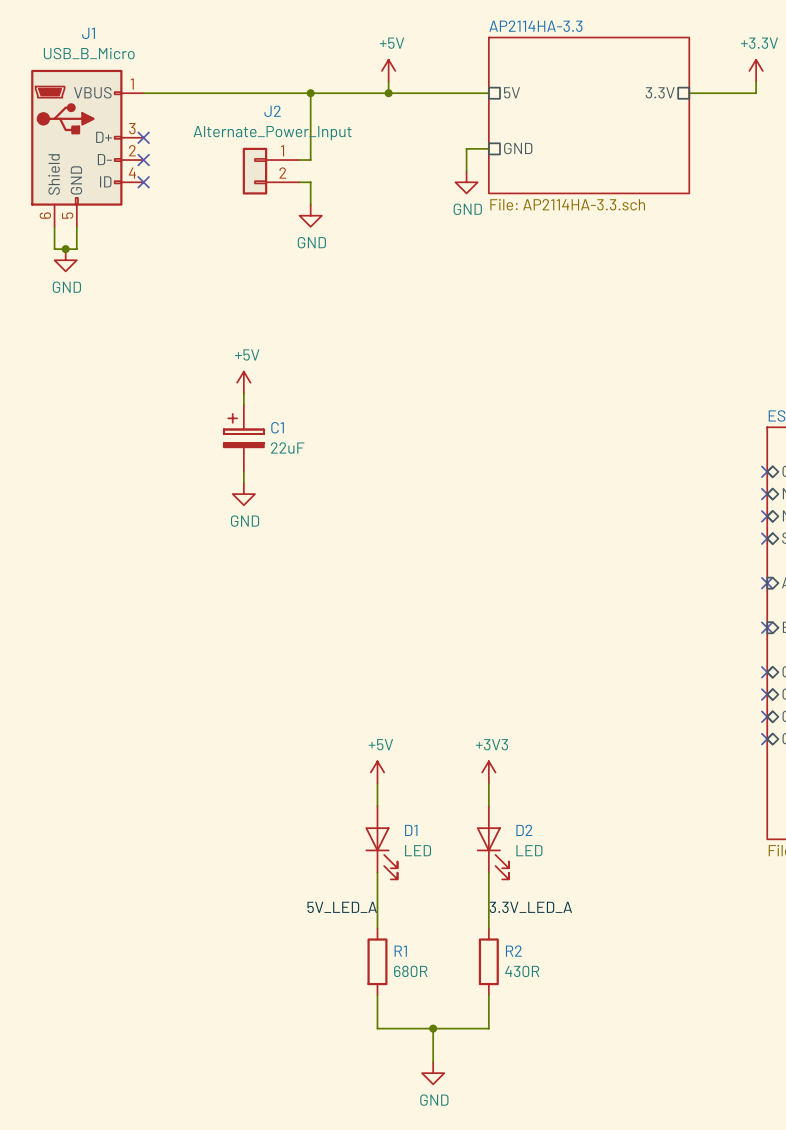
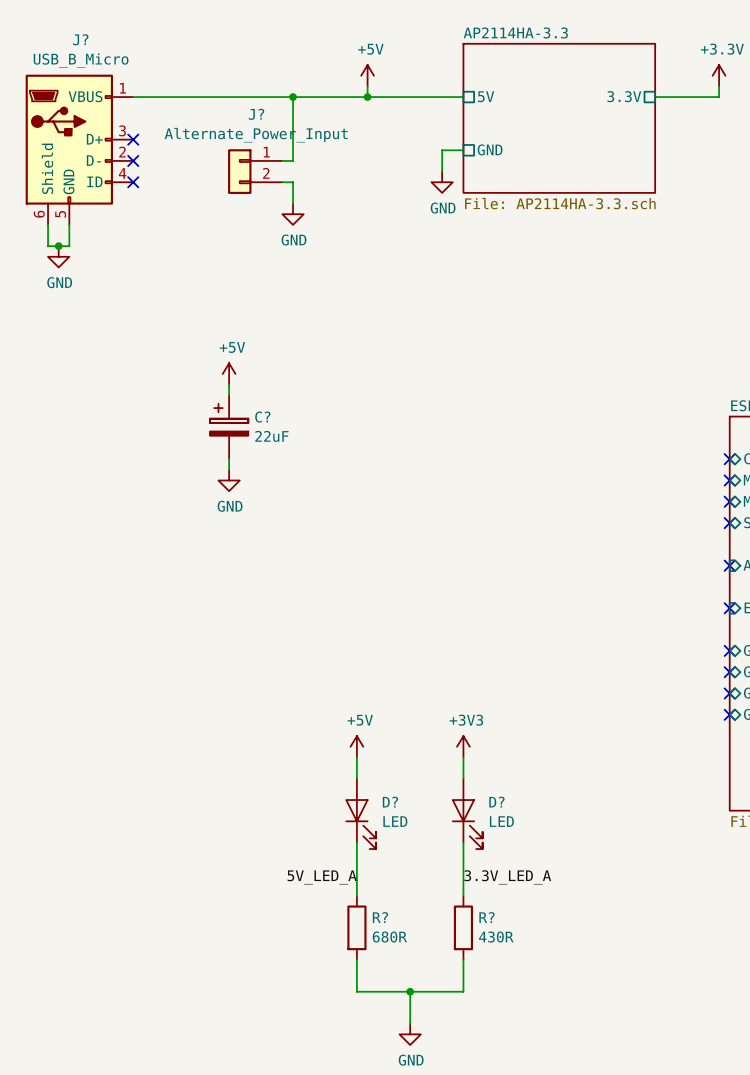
J1 name: J1 (88, 33) -> J? (80, 39)
J2 name: J2 (272, 111) -> J? (256, 114)
C1 name: C1 (277, 427) -> C? (262, 417)
D1 name: D1 (411, 830) -> D? (390, 802)
D2 name: D2 (524, 830) -> D? (496, 802)
R1 name: R1 (400, 951) -> R? (380, 917)
R2 name: R2 (513, 951) -> R? (486, 917)

